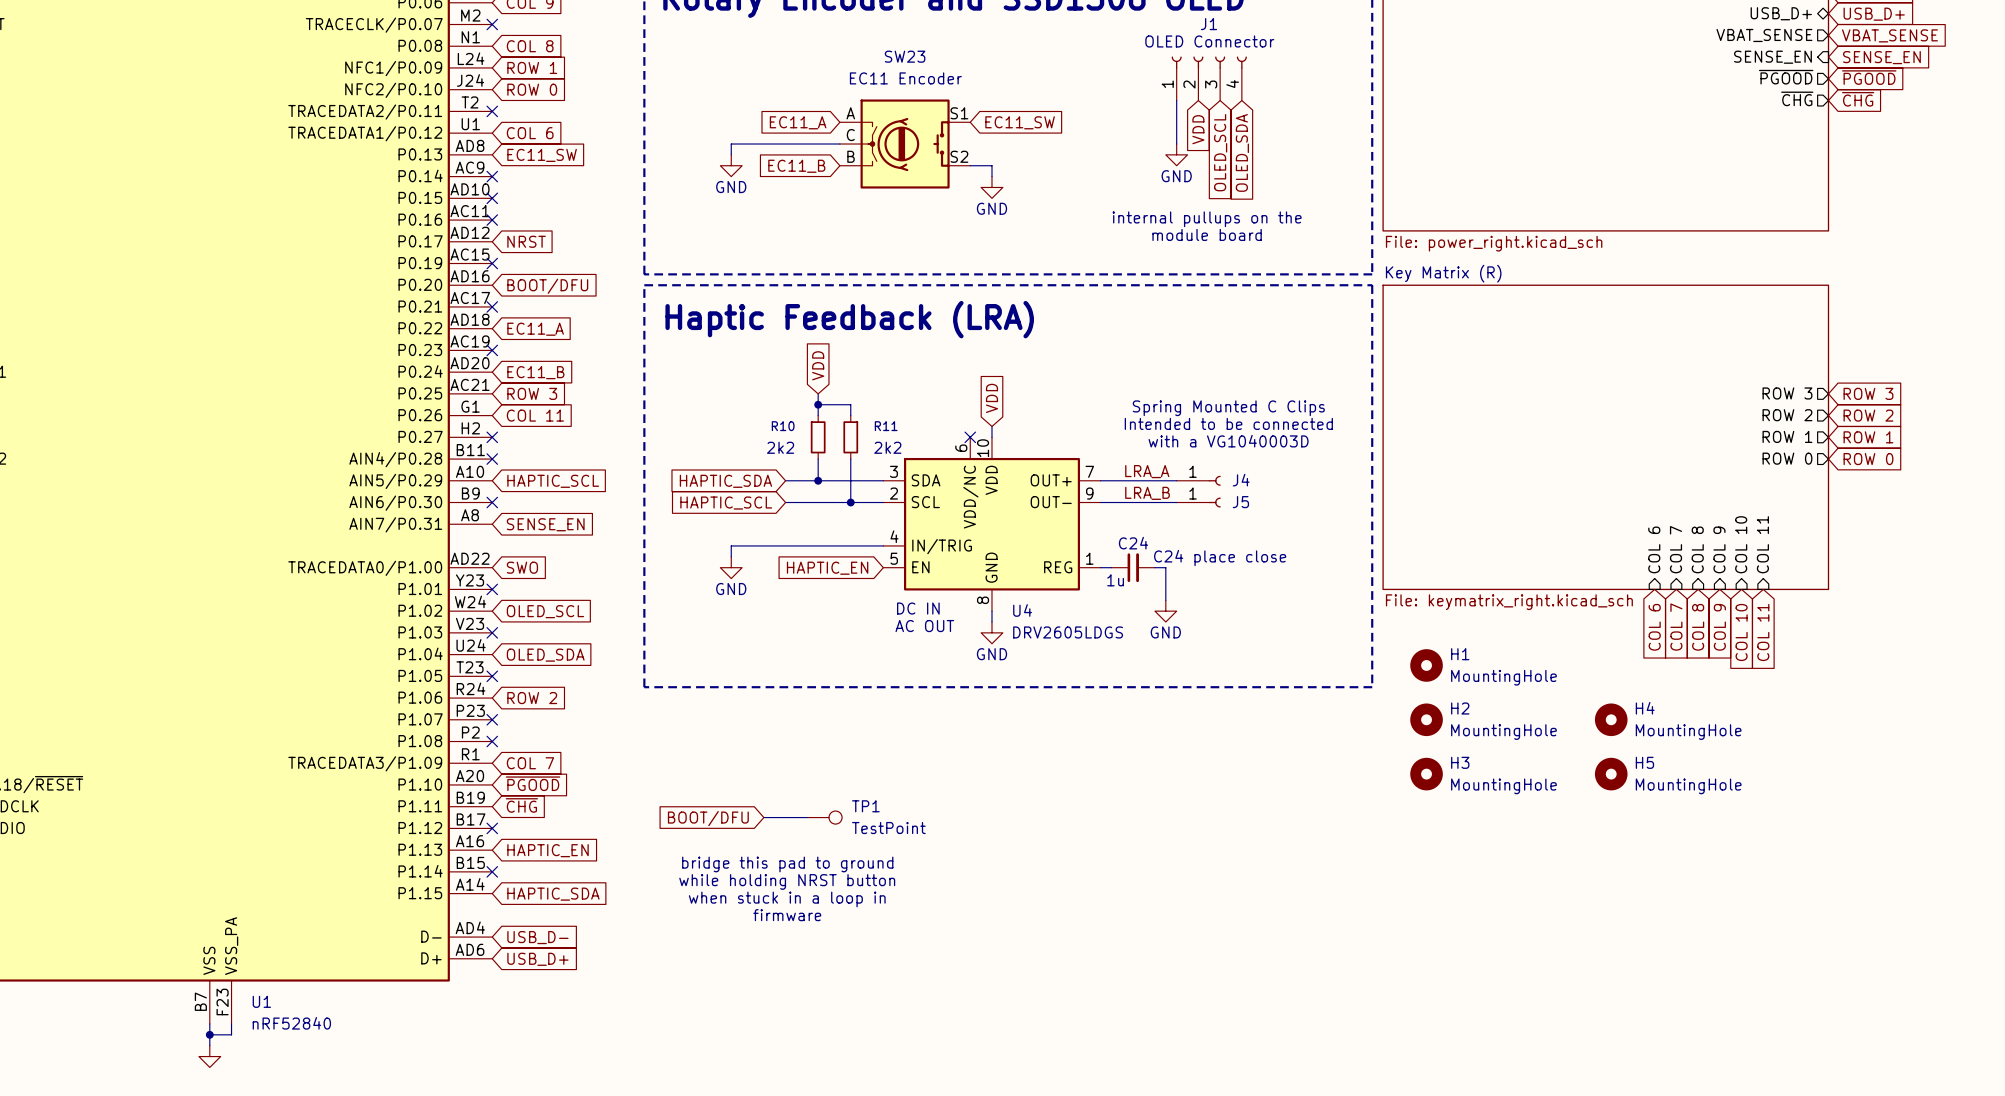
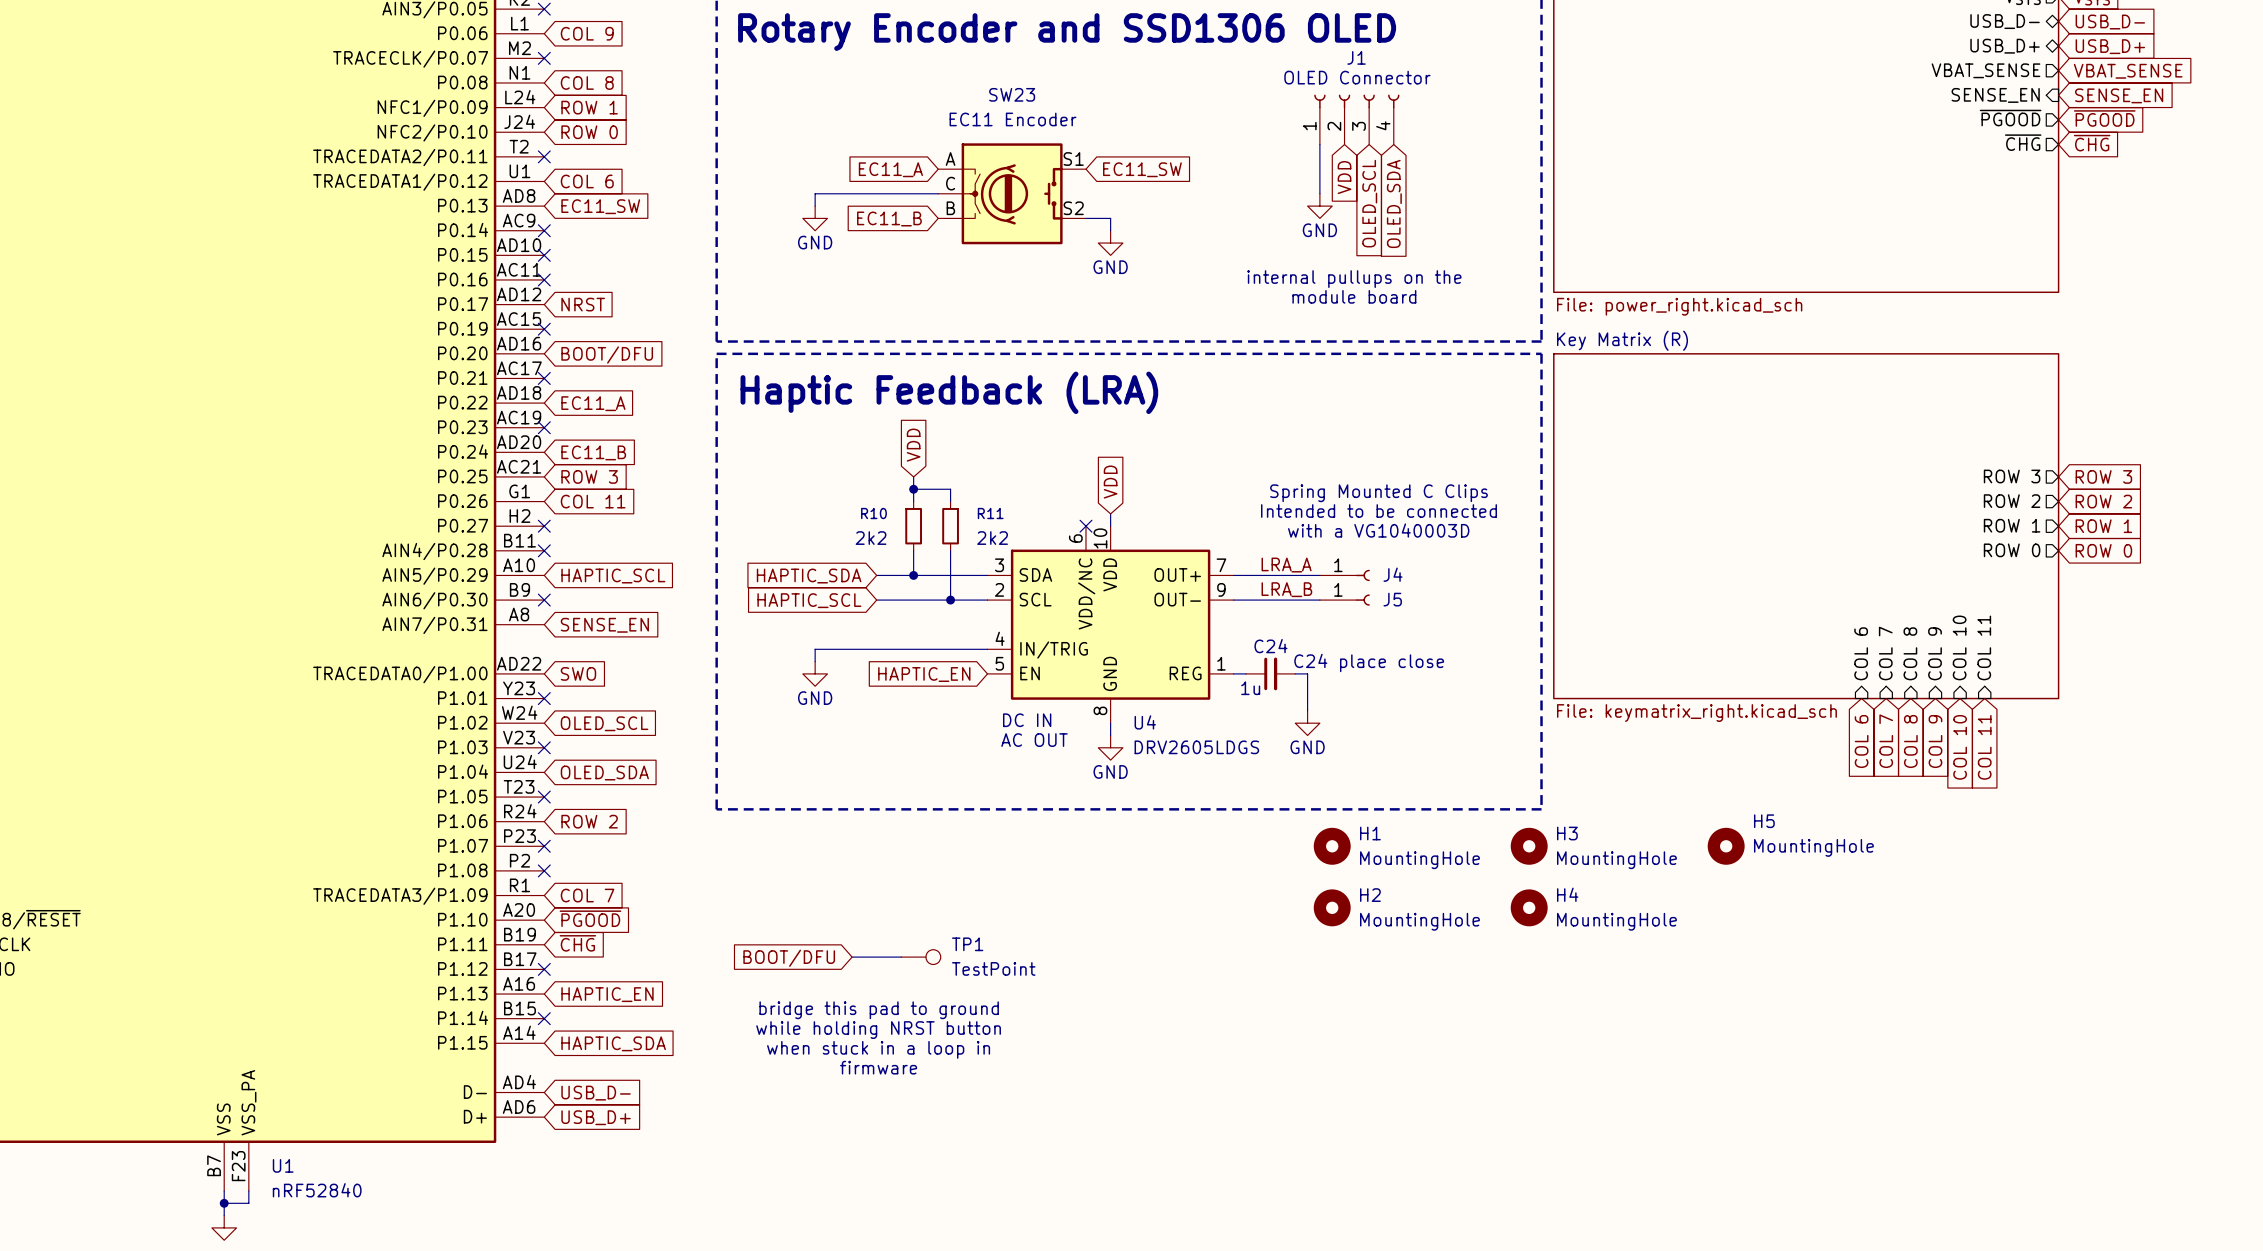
H1 position: (1426, 665) -> (1332, 846)
H2 position: (1426, 719) -> (1332, 907)
H4 position: (1611, 719) -> (1529, 907)
H5 name position: H5 (1644, 762) -> H5 (1764, 821)
H3 position: (1426, 774) -> (1529, 846)
H5 position: (1611, 774) -> (1726, 846)
H5 value position: MountingHole (1688, 786) -> MountingHole (1813, 847)

